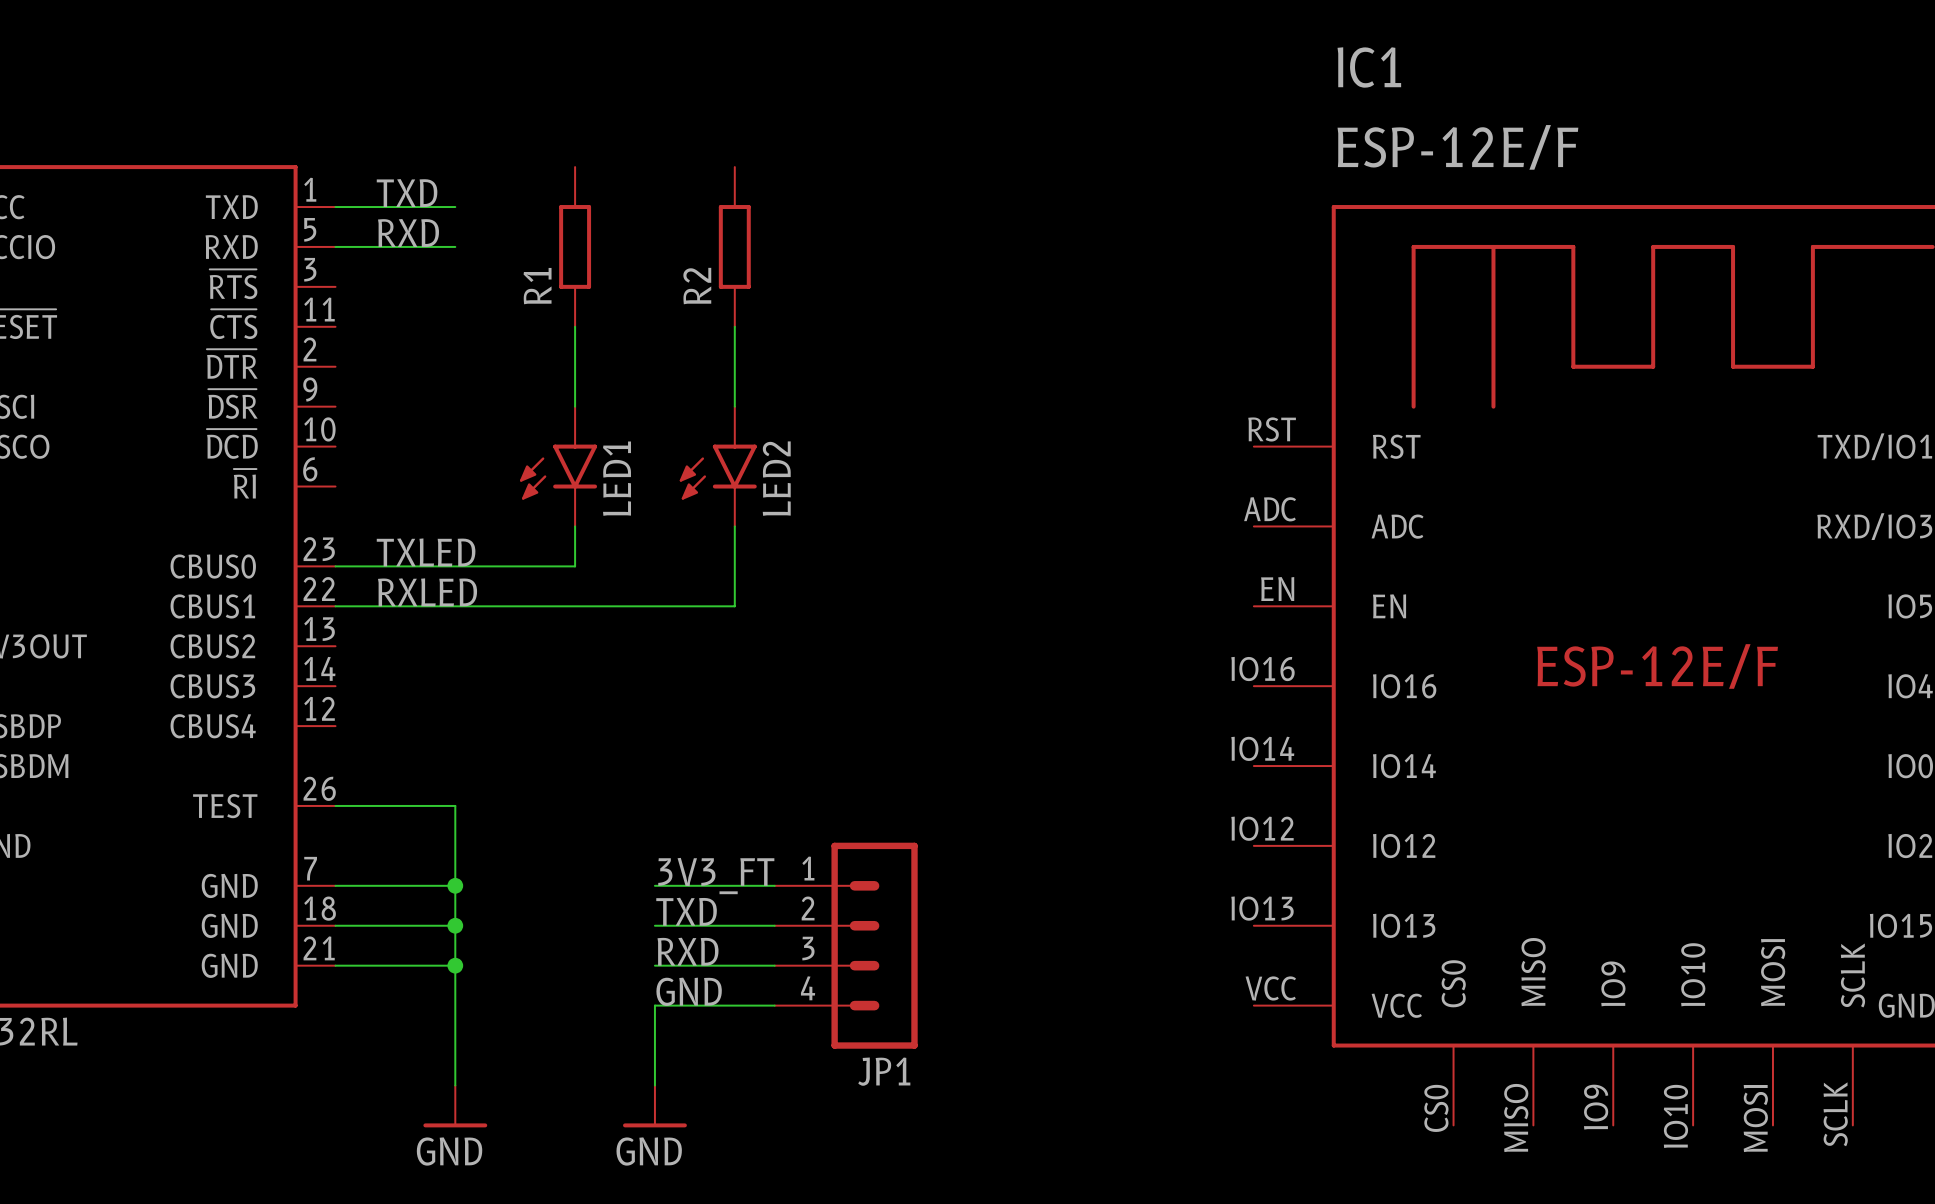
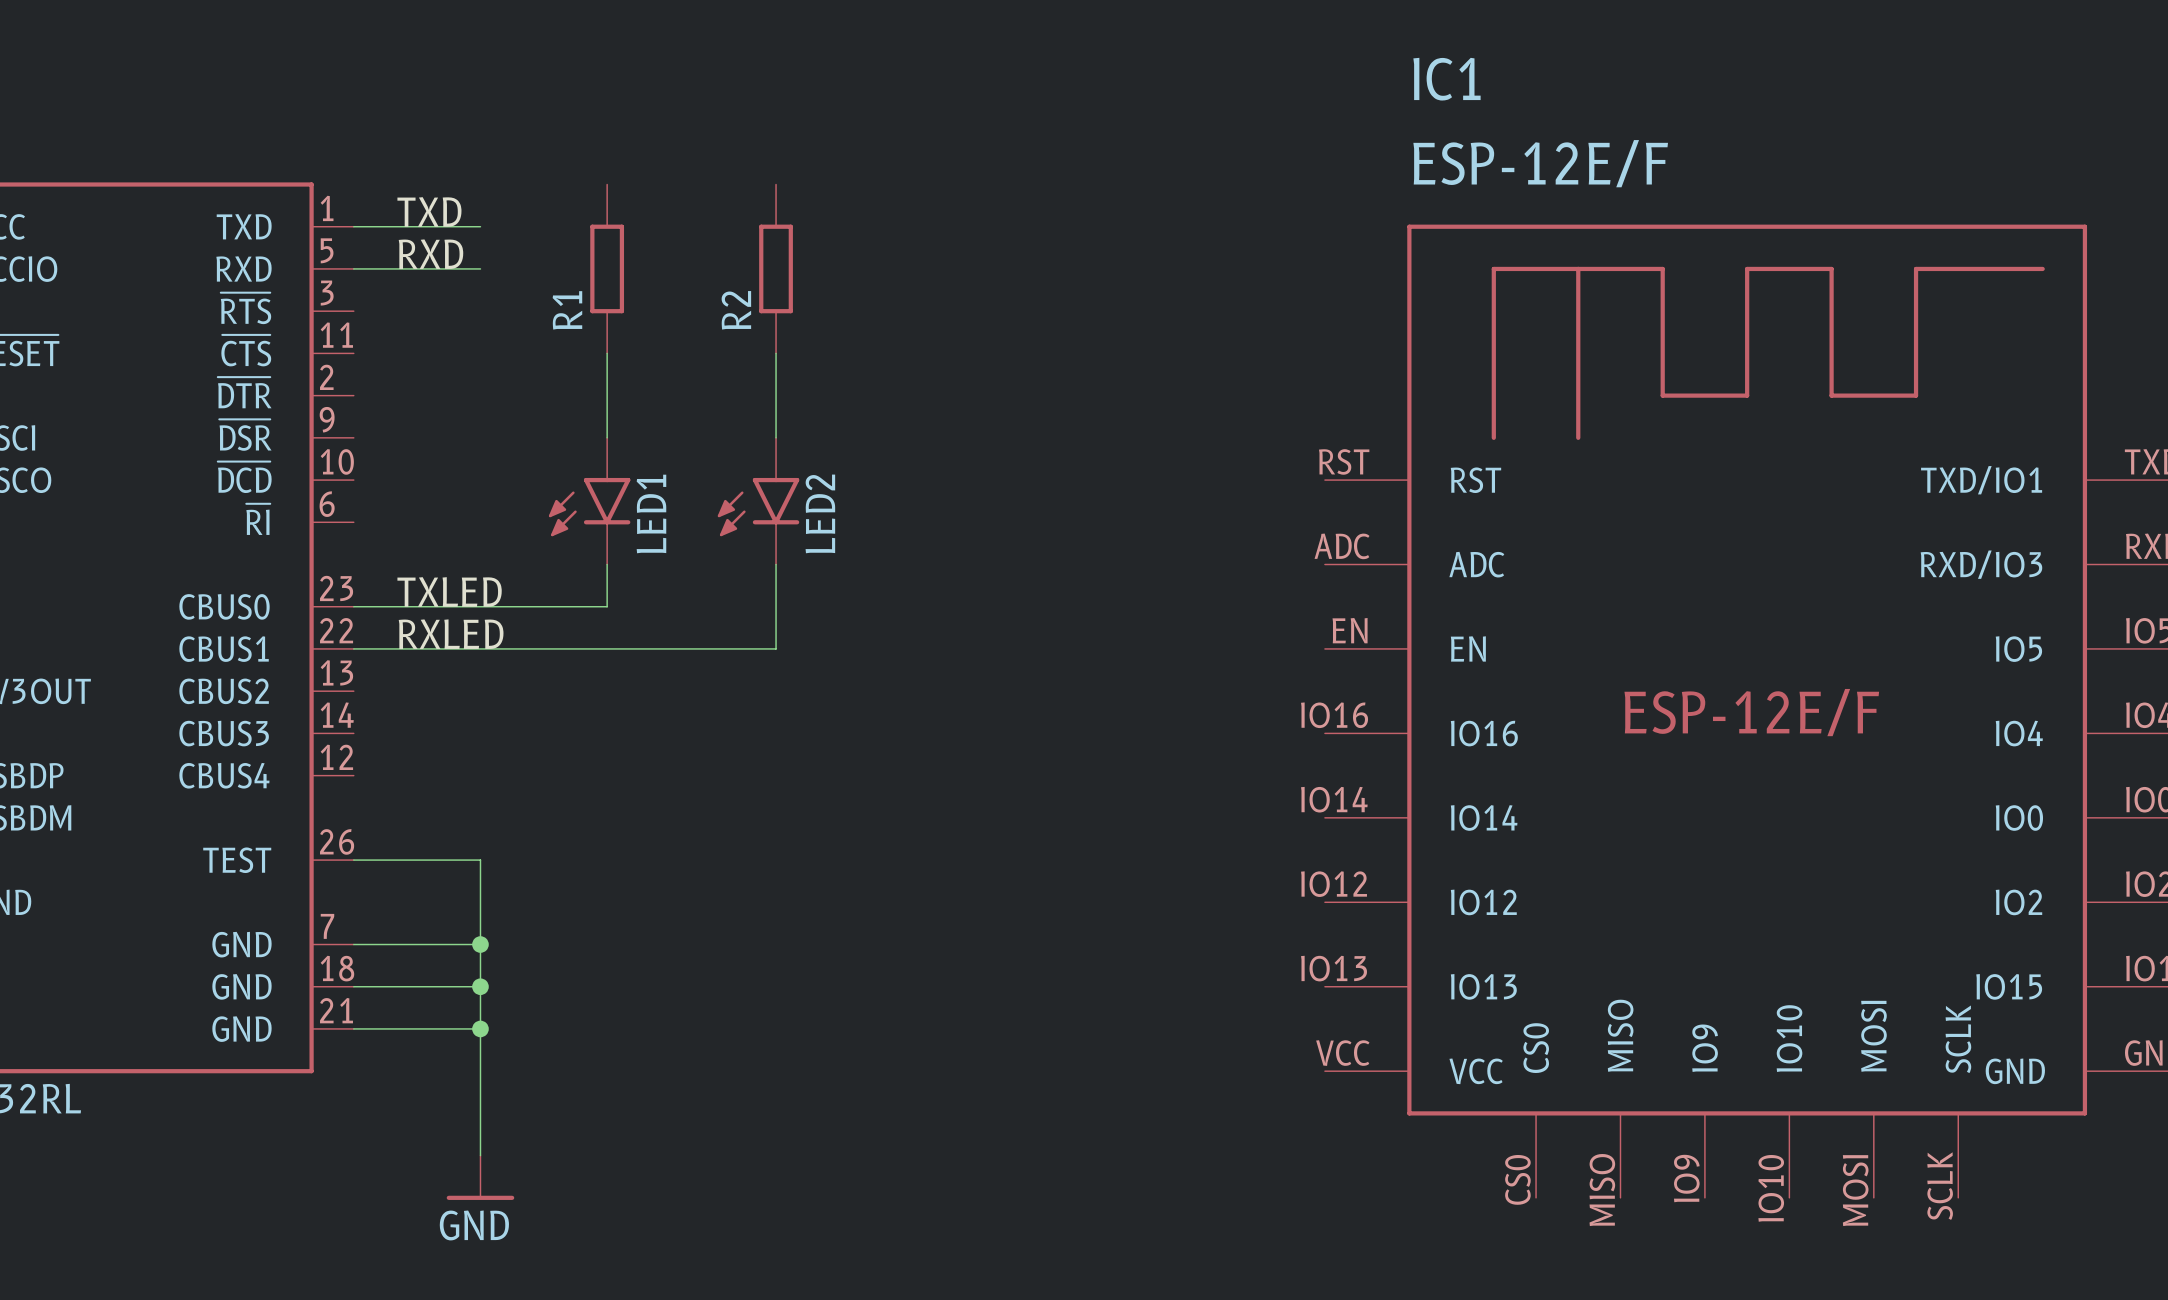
label: 3V3_FT (716, 876) -> none
wire: (654, 885) (774, 885) -> none
label: TXD (686, 911) -> none
wire: (654, 925) (774, 925) -> none
JP1: (846, 945) -> none
label: RXD (688, 951) -> none
wire: (654, 965) (774, 965) -> none
label: GND (689, 991) -> none
wire: (774, 1005) (654, 1005) (654, 1085) -> none
power symbol: GND (654, 1106) -> none

